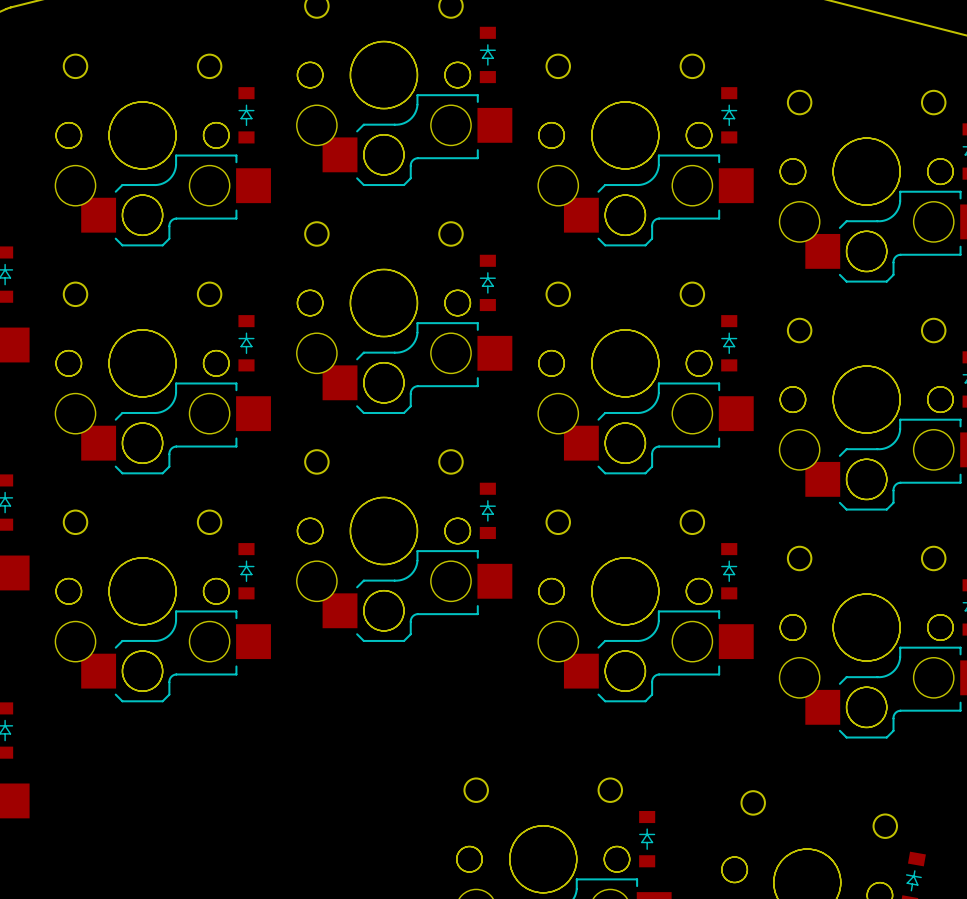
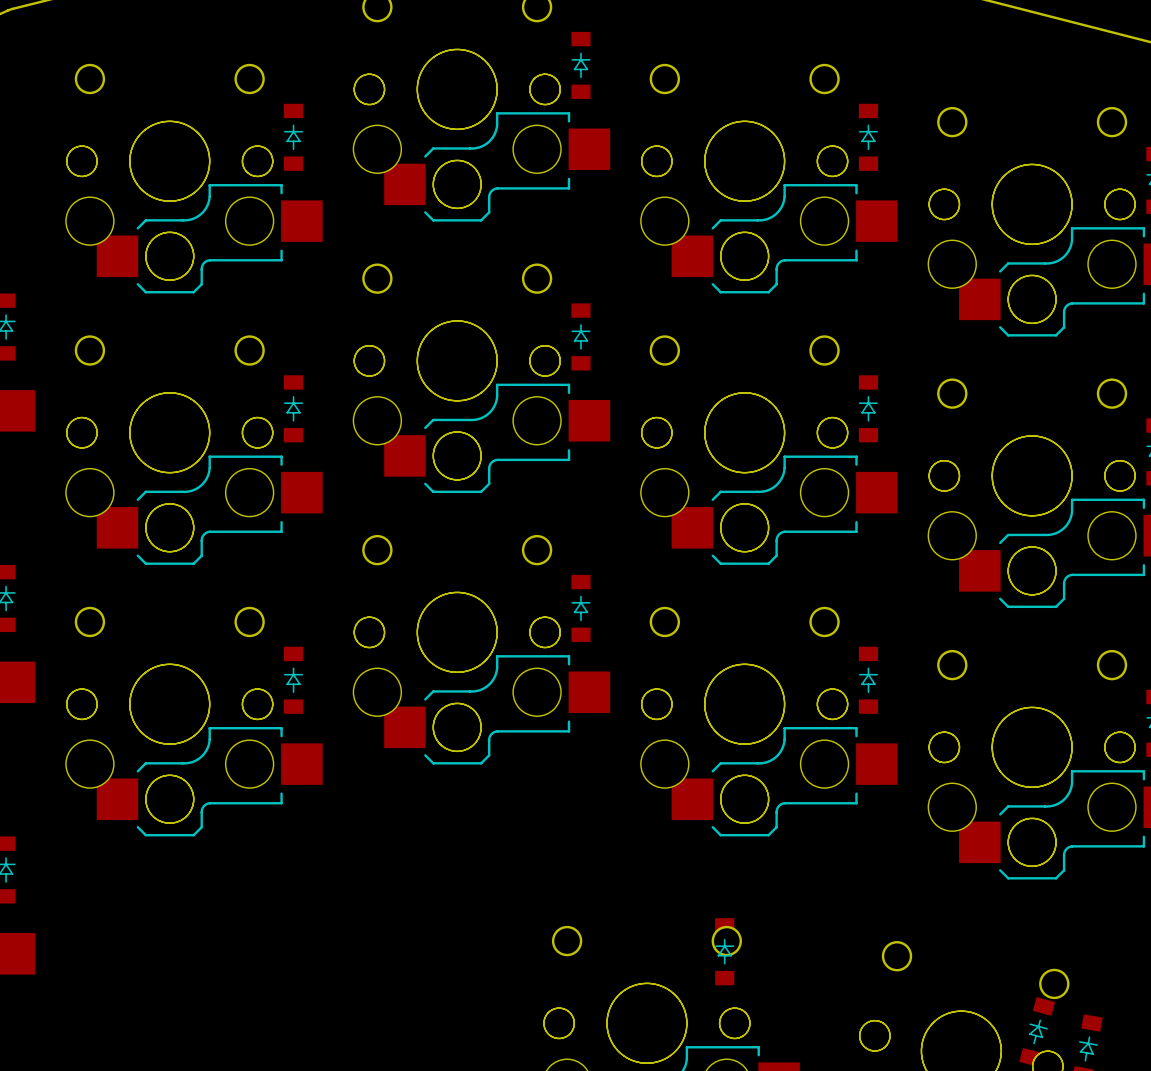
part position: (647, 839) -> (724, 951)
part: none -> (1037, 1031)

